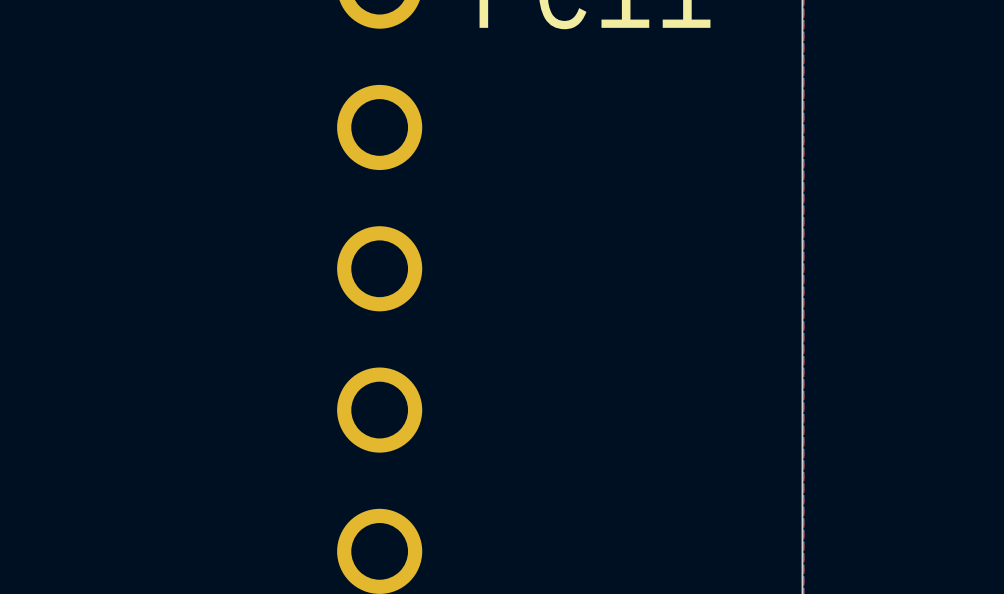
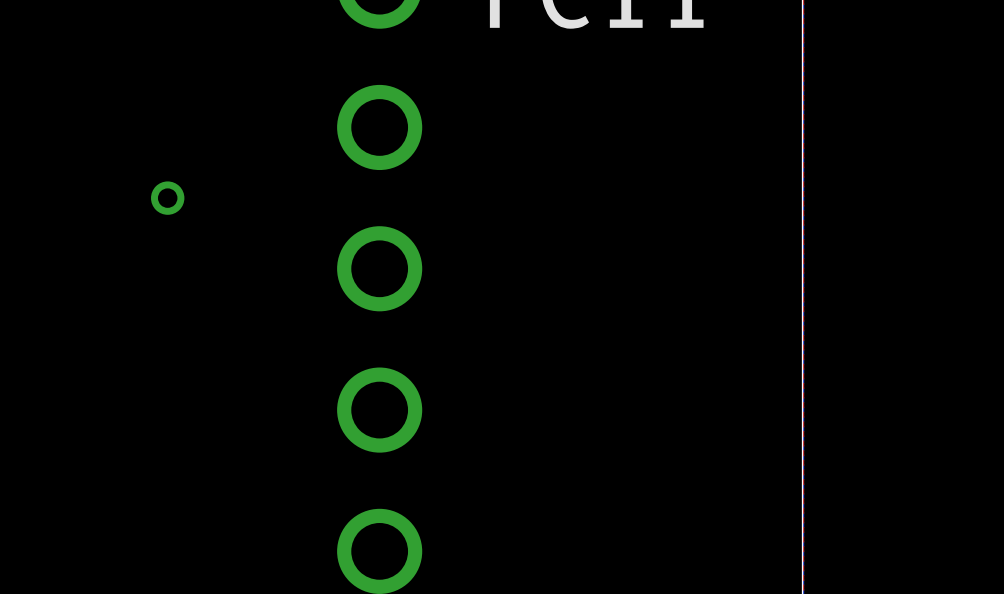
via: none -> (167, 198)

